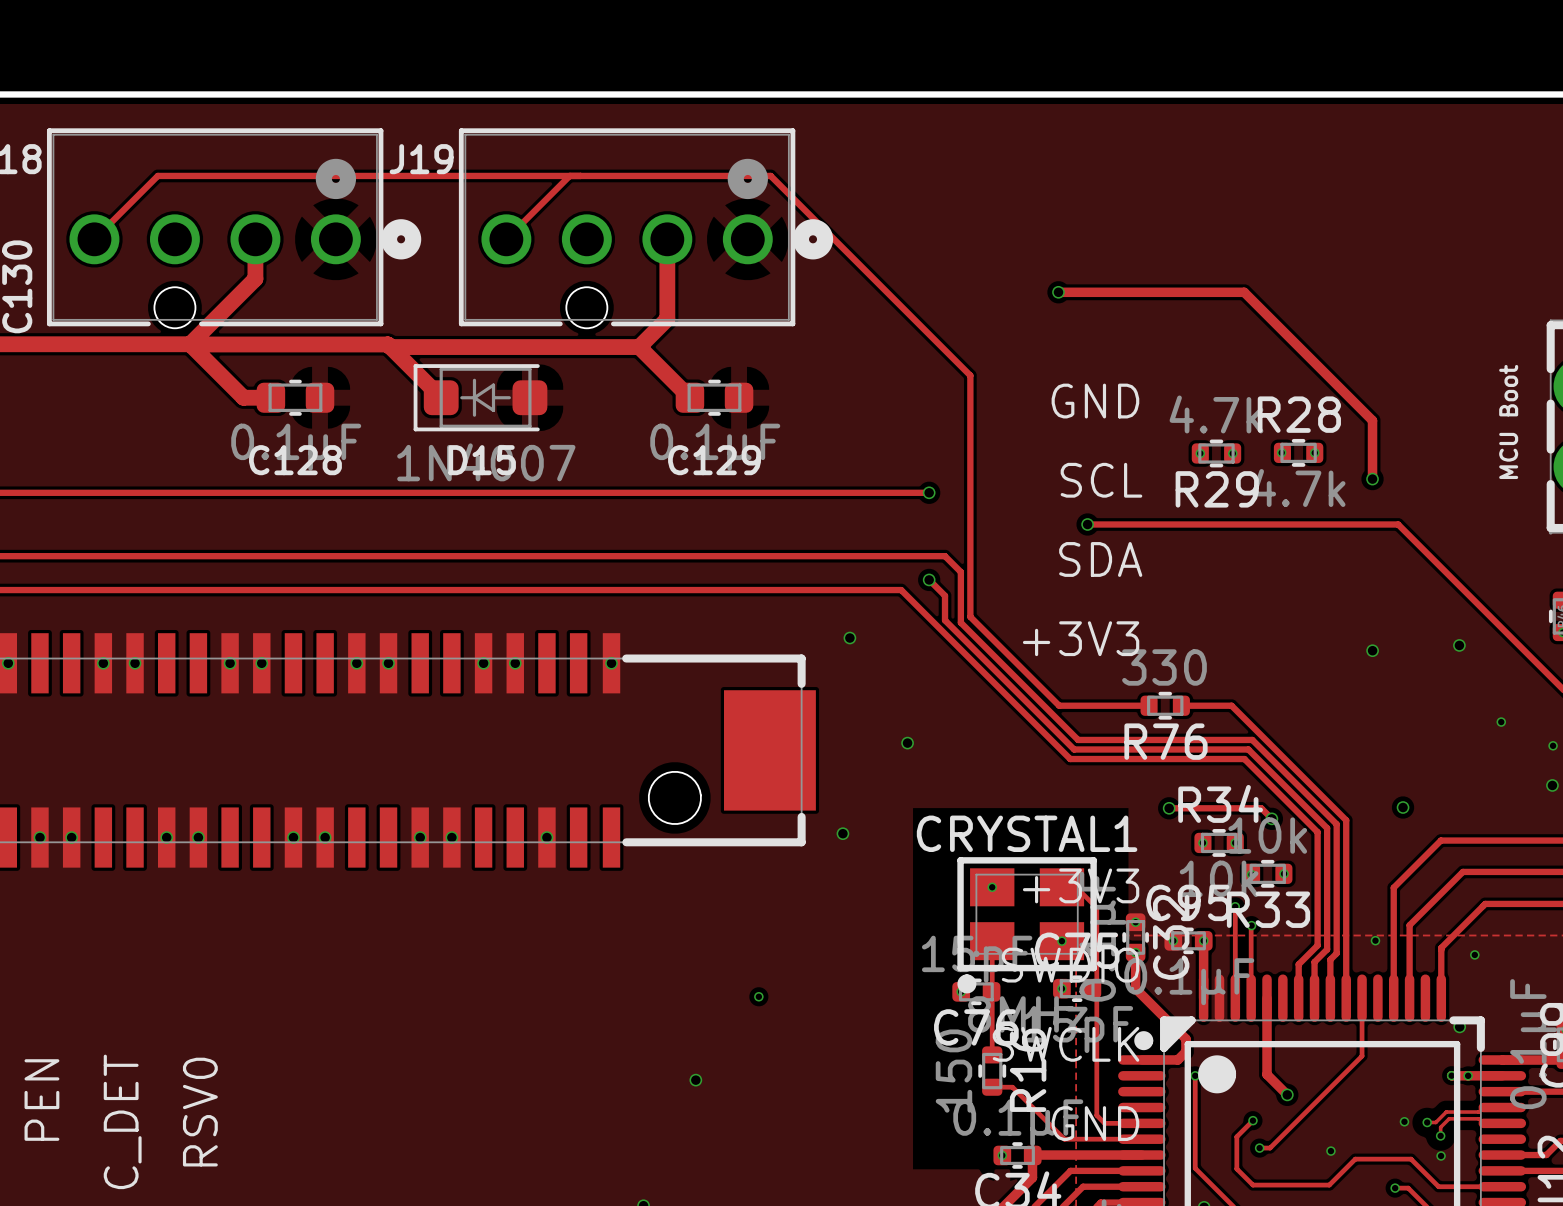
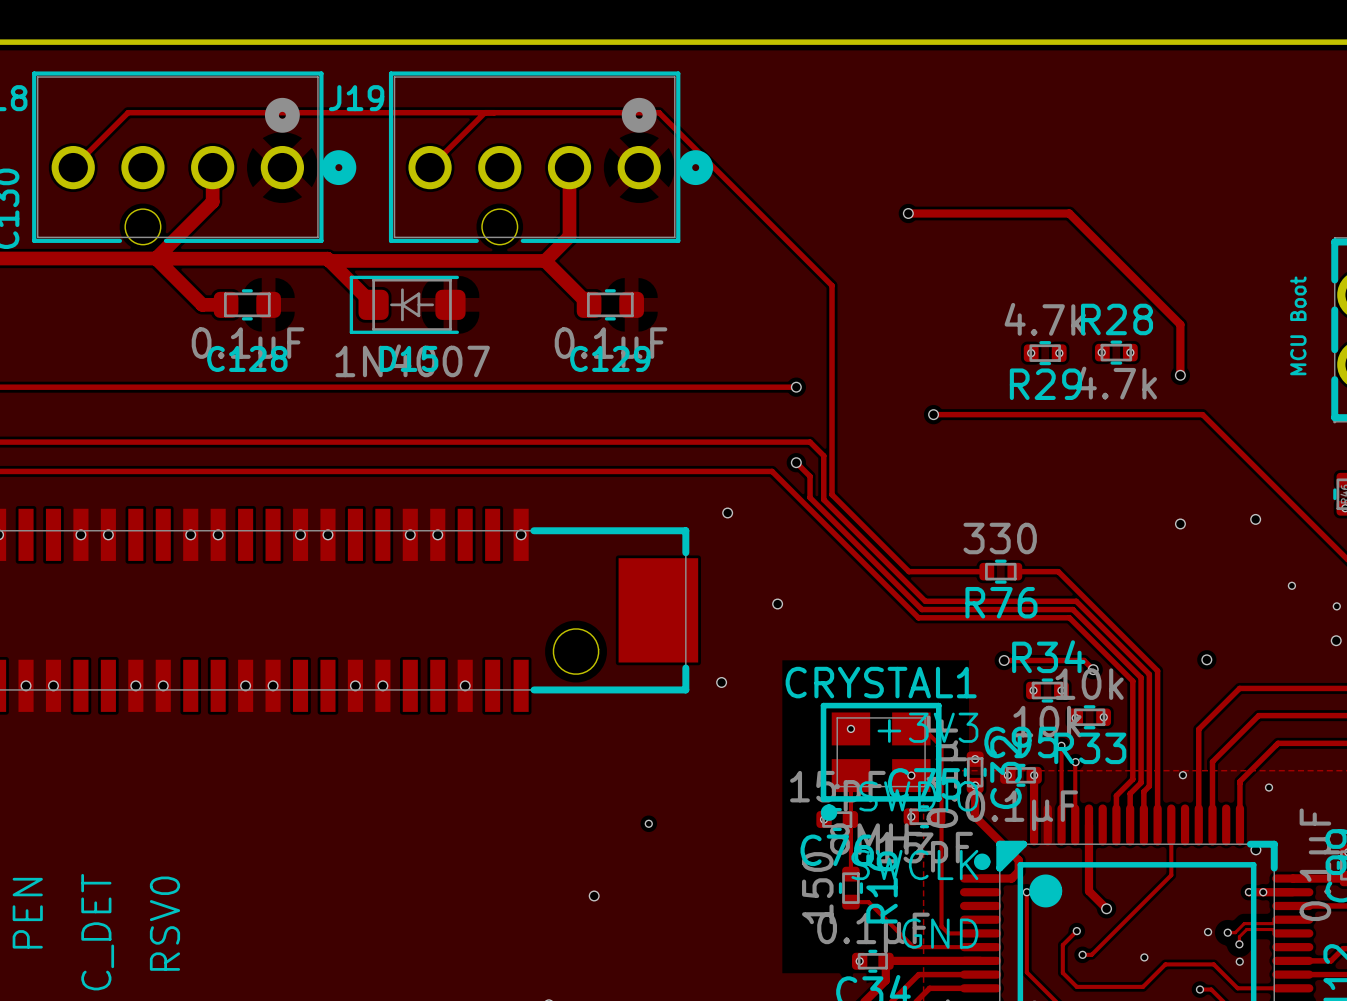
text: GND (1095, 401) -> none
text: SCL (1101, 480) -> none
text: SDA (1100, 559) -> none
text: +3V3 (1081, 638) -> none

